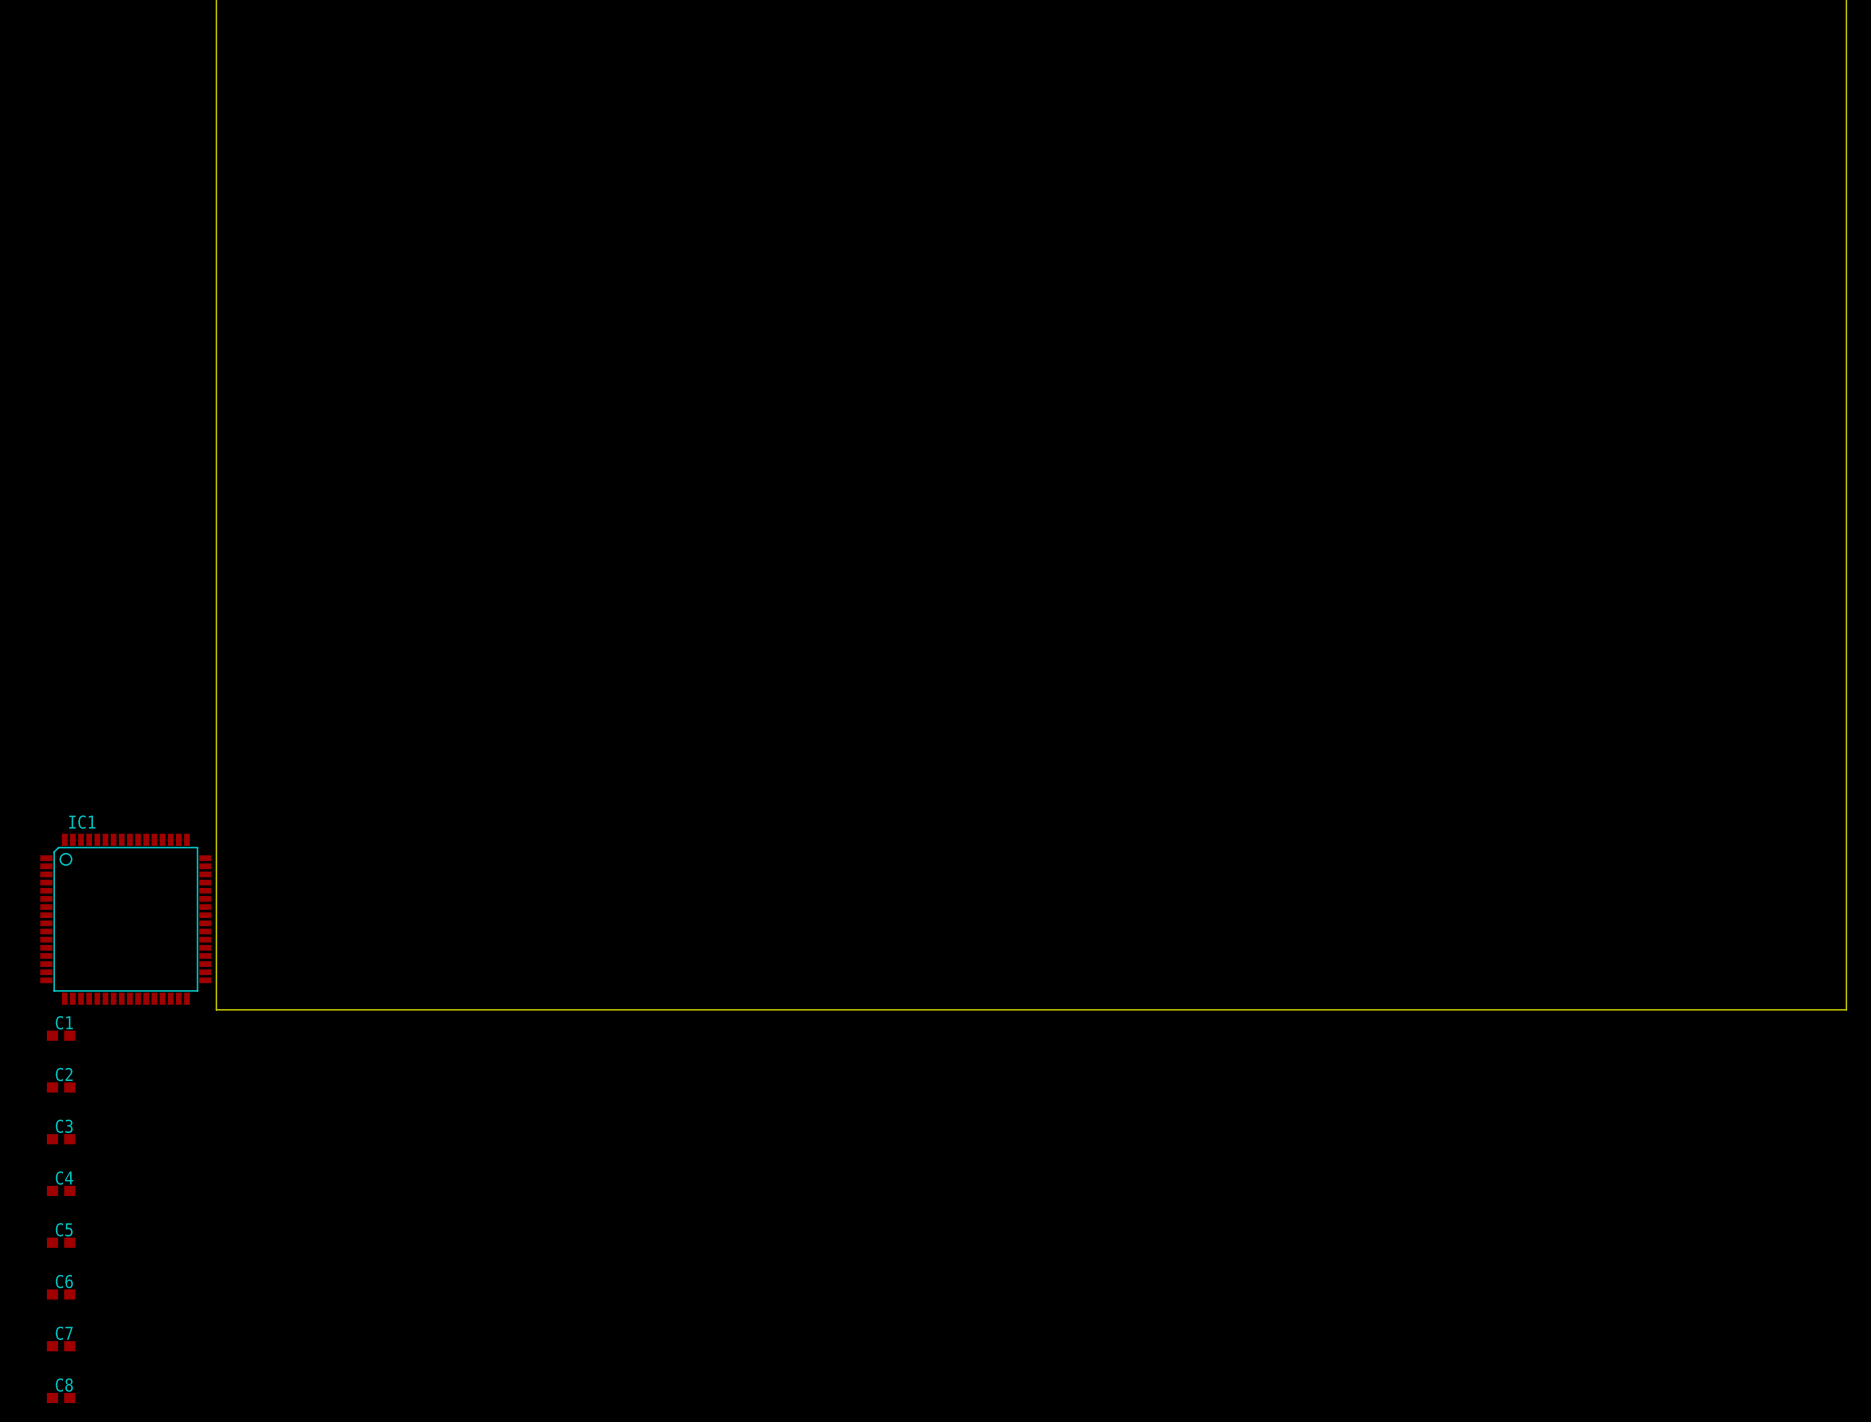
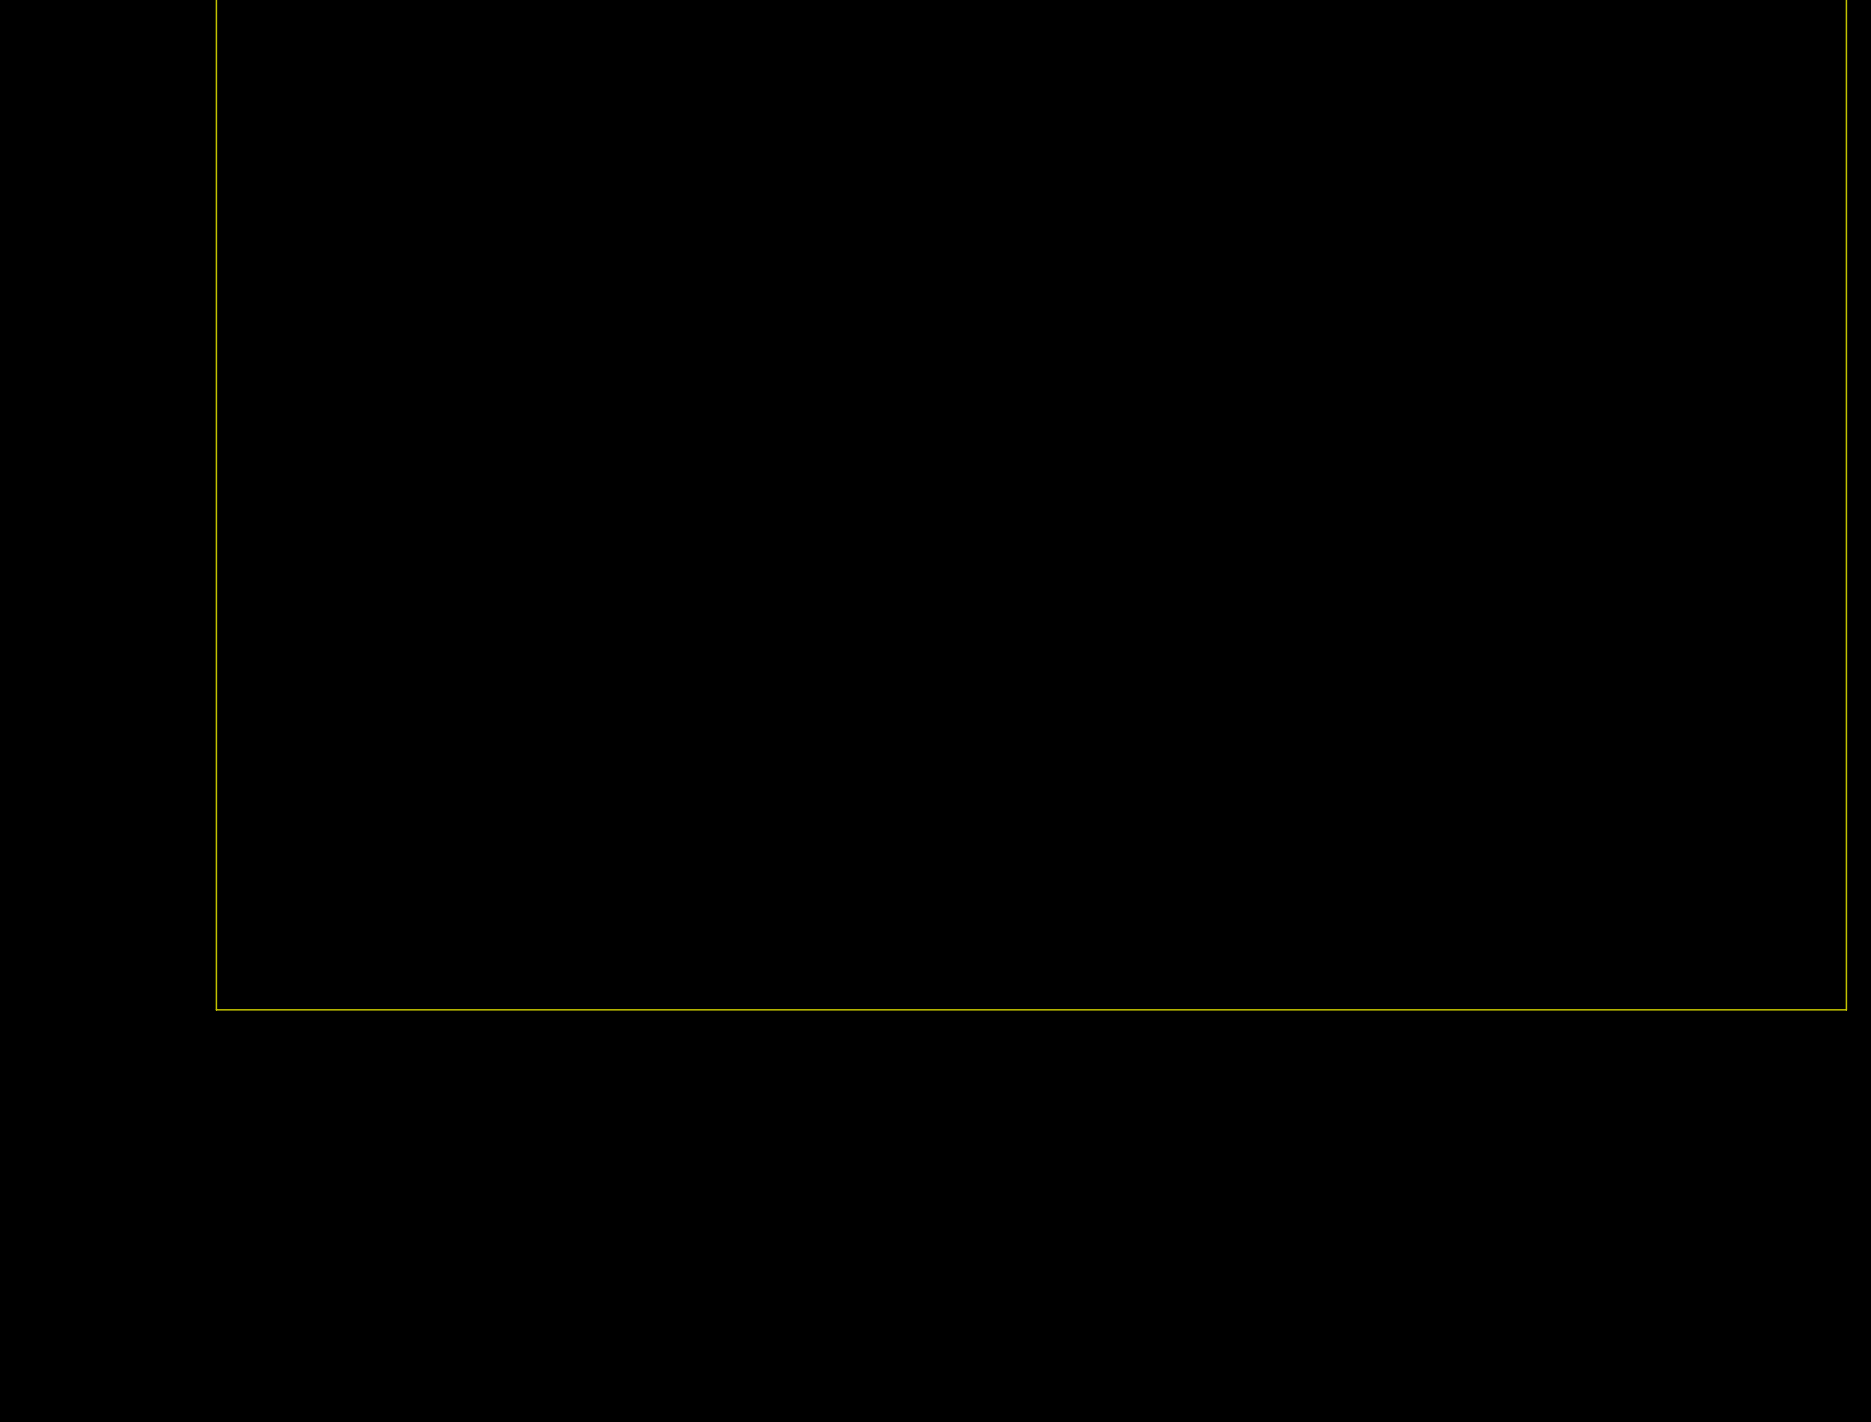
IC1: (125, 919) -> none
C1: (61, 1035) -> none
C2: (61, 1087) -> none
C3: (61, 1139) -> none
C4: (61, 1190) -> none
C5: (61, 1242) -> none
C6: (61, 1294) -> none
C7: (61, 1346) -> none
C8: (61, 1397) -> none

